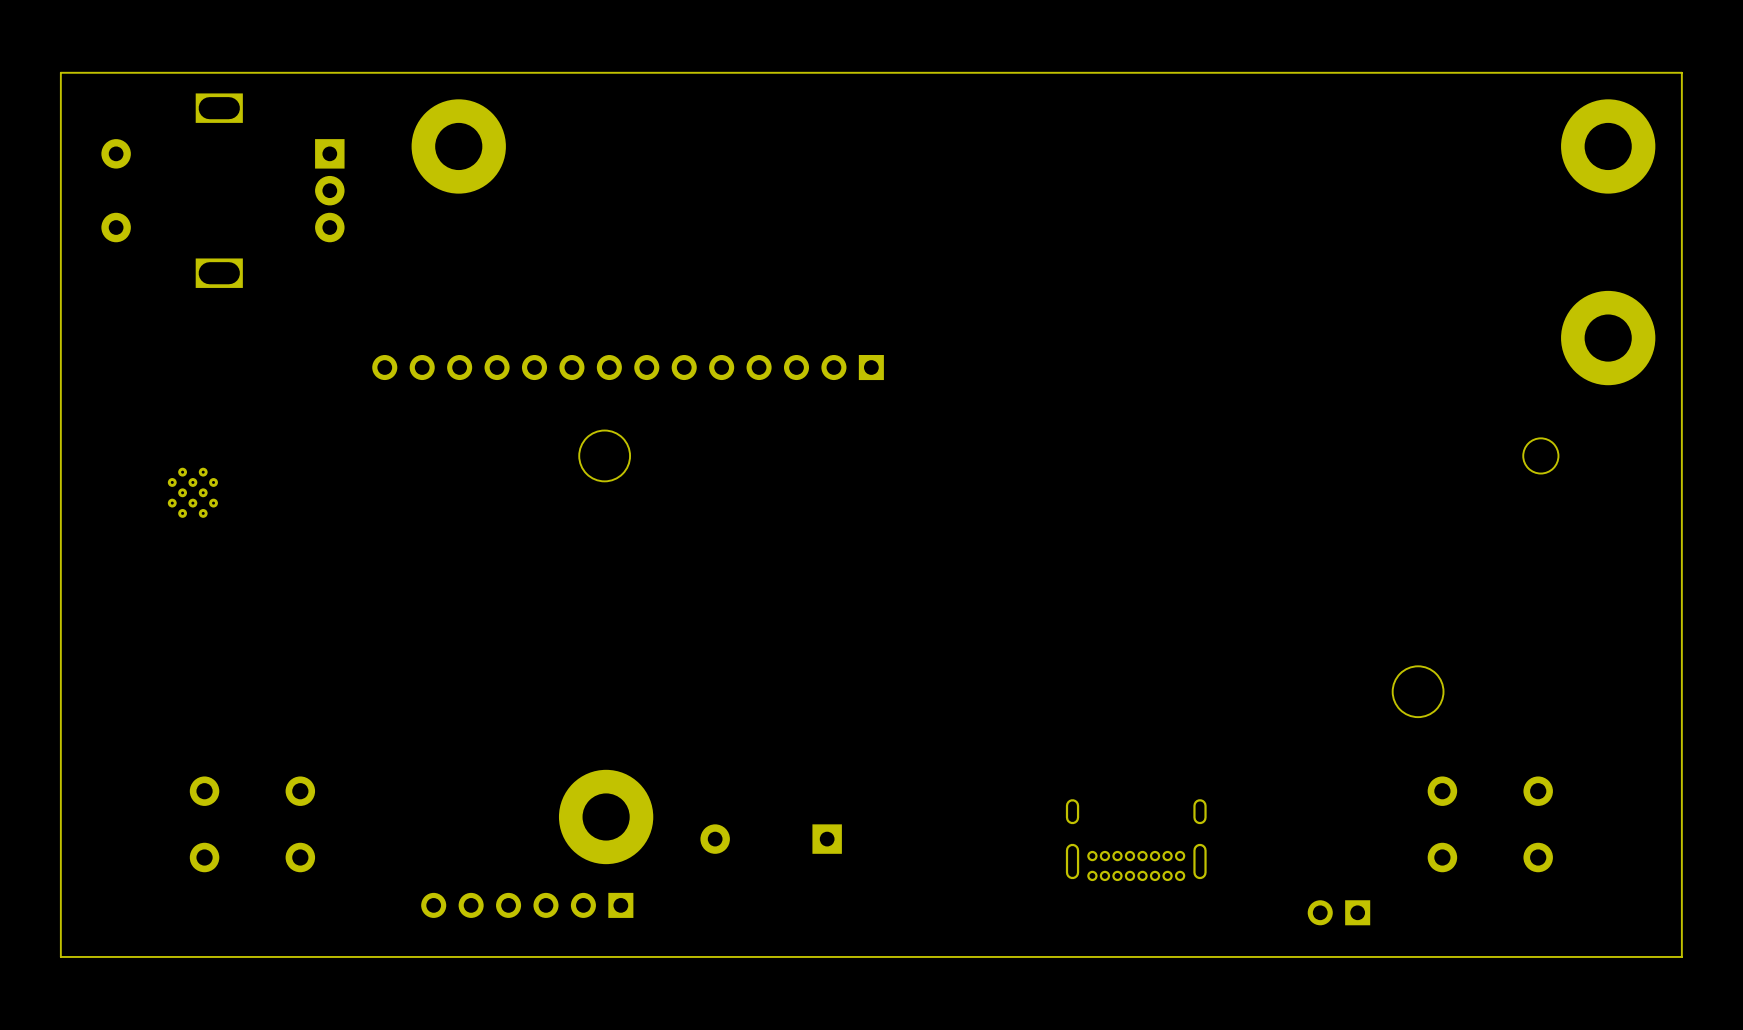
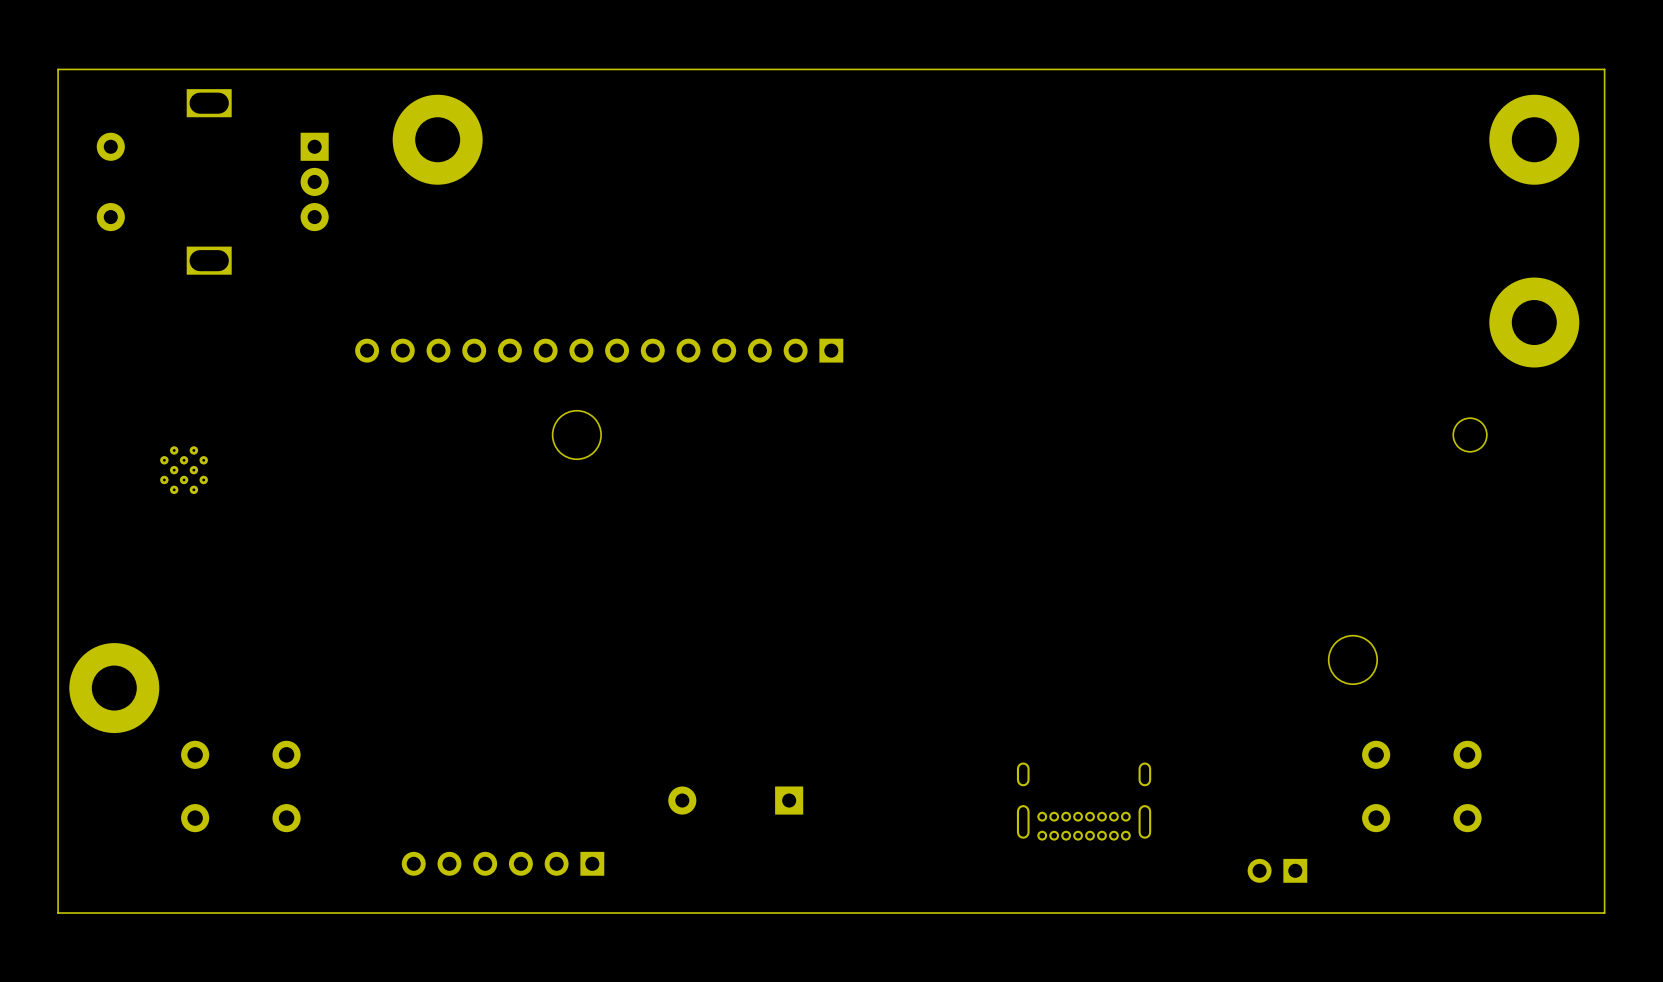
part: none -> (114, 688)
part: (606, 816) -> none

